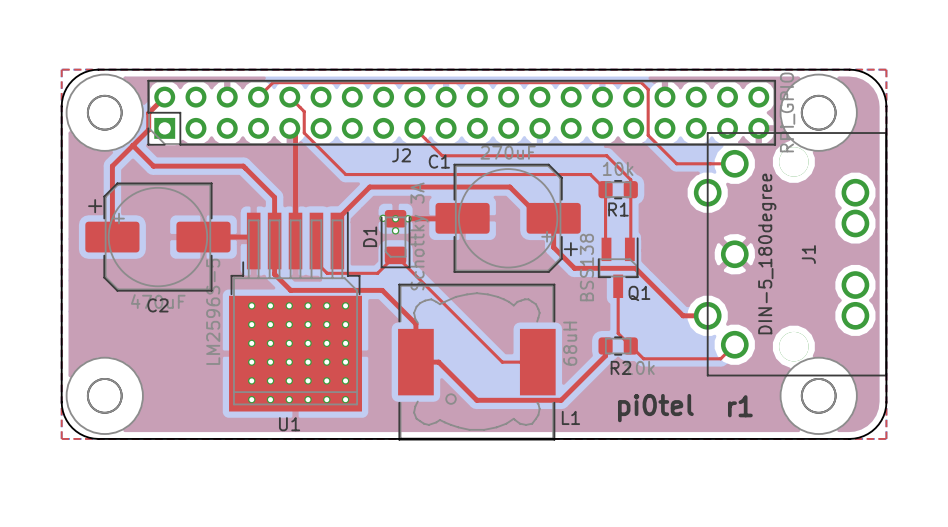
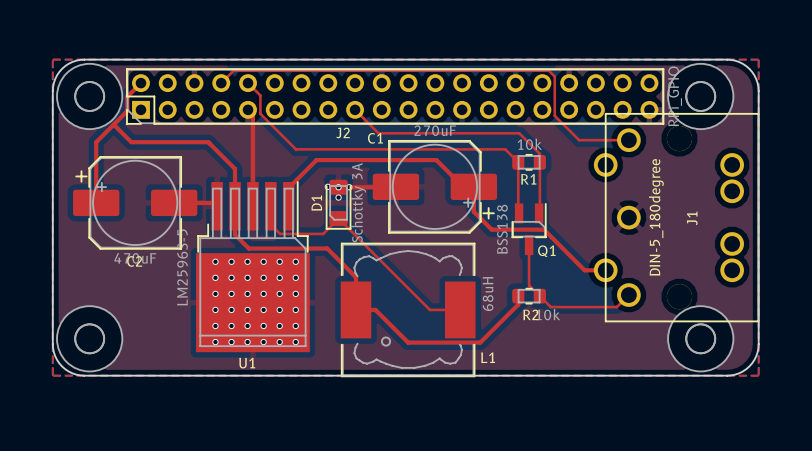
text: r1 (740, 406) -> none
text: pi0tel (655, 408) -> none

